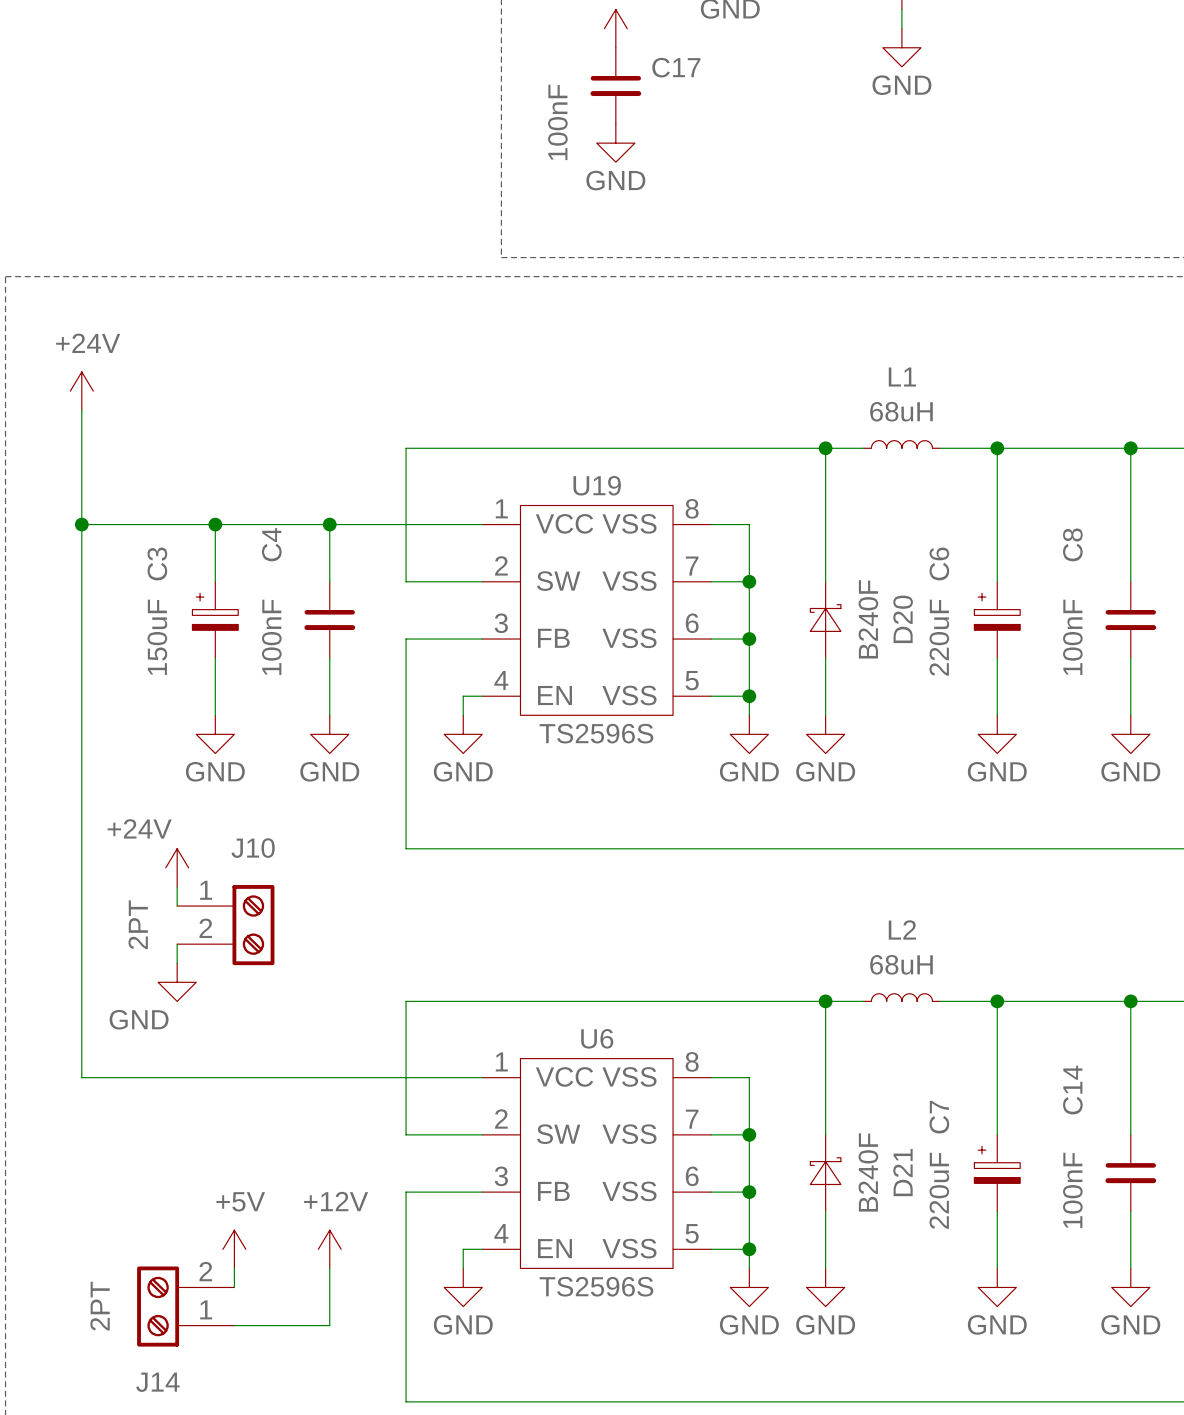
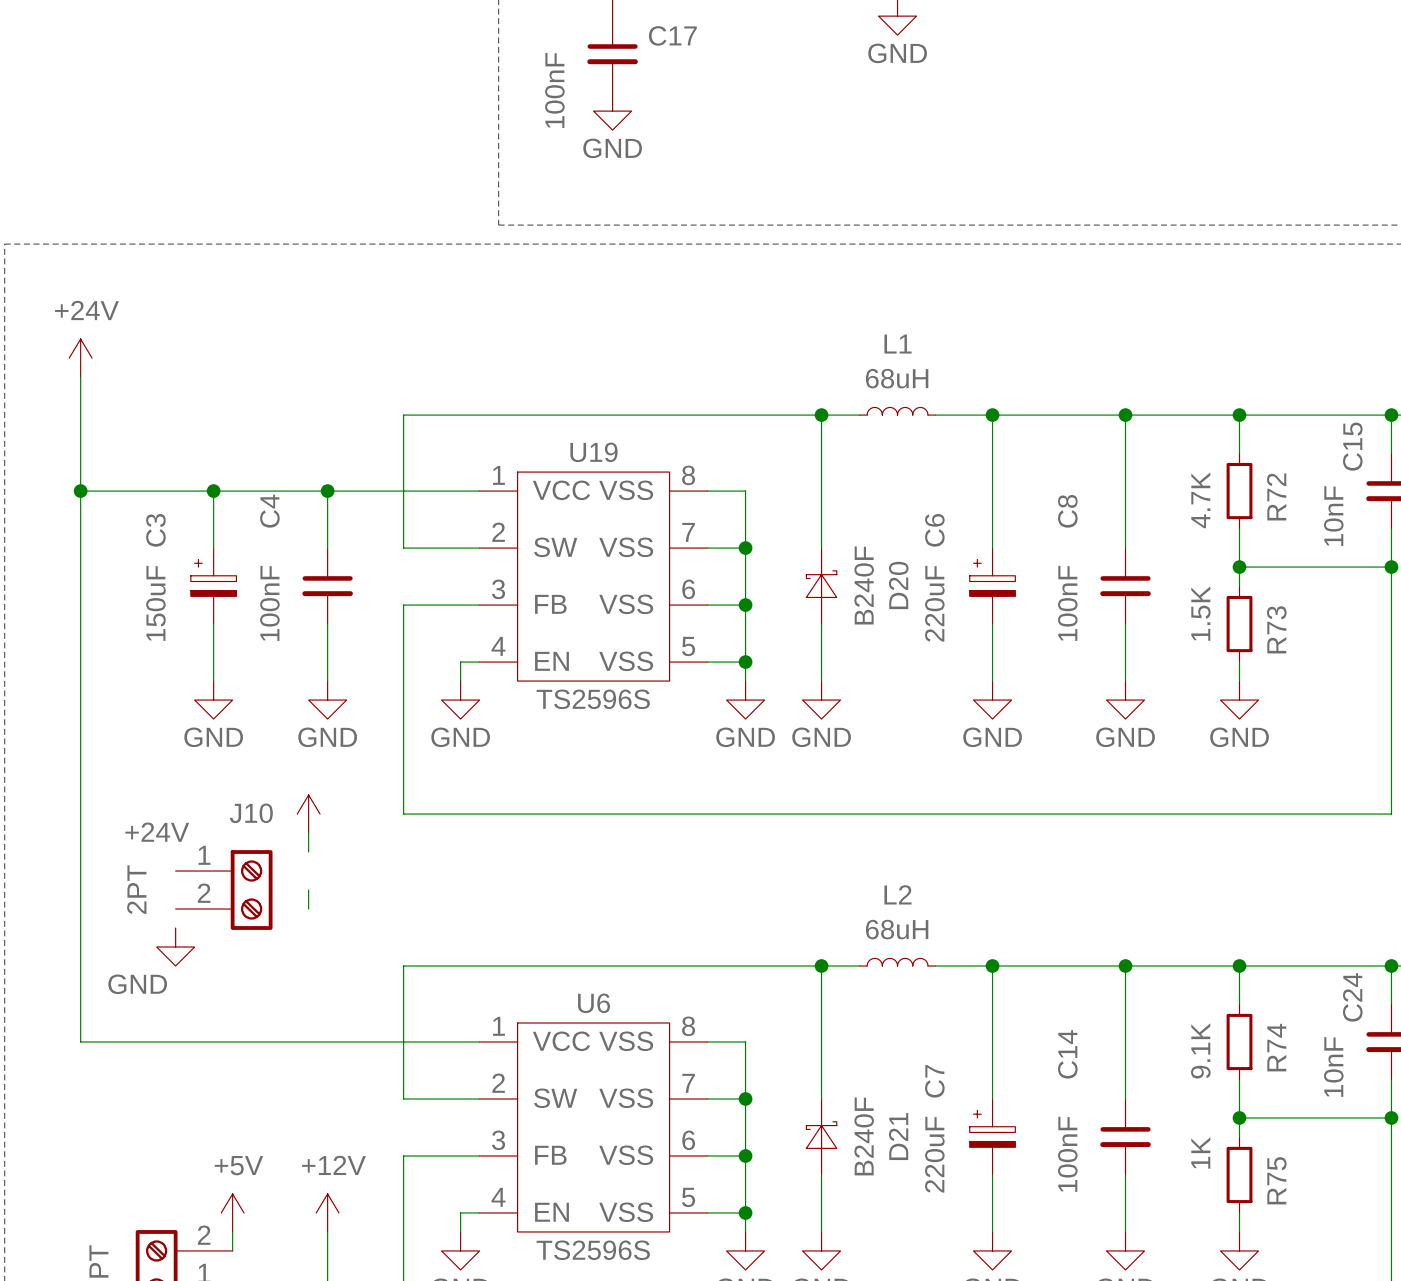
power symbol text position: +24V (139, 828) -> +24V (157, 832)
power symbol position: +24V (177, 867) -> +24V (308, 814)
wire: (177, 886) (177, 906) -> (308, 833) (308, 852)
wire: (177, 944) (177, 963) -> (308, 890) (308, 909)

